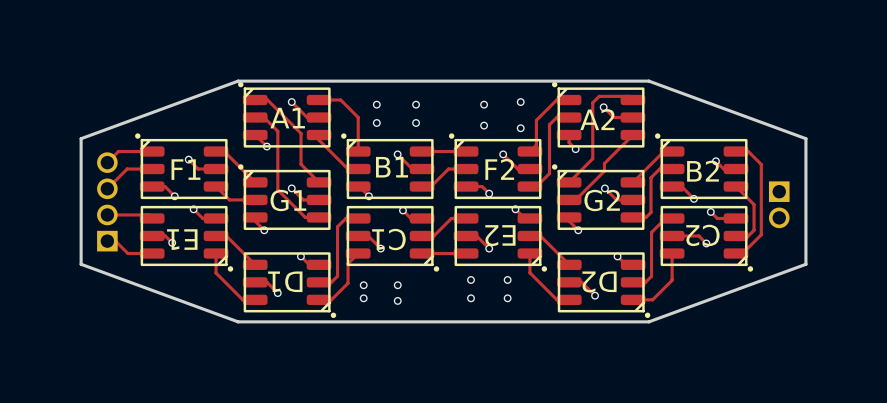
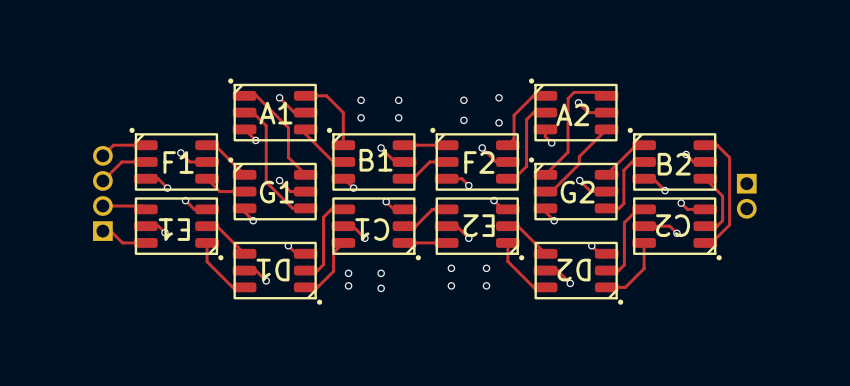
board edge: (238, 81) (81, 138) (81, 264) (238, 321) (648, 321) (805, 264) (805, 138) (648, 81) (238, 81) -> none

